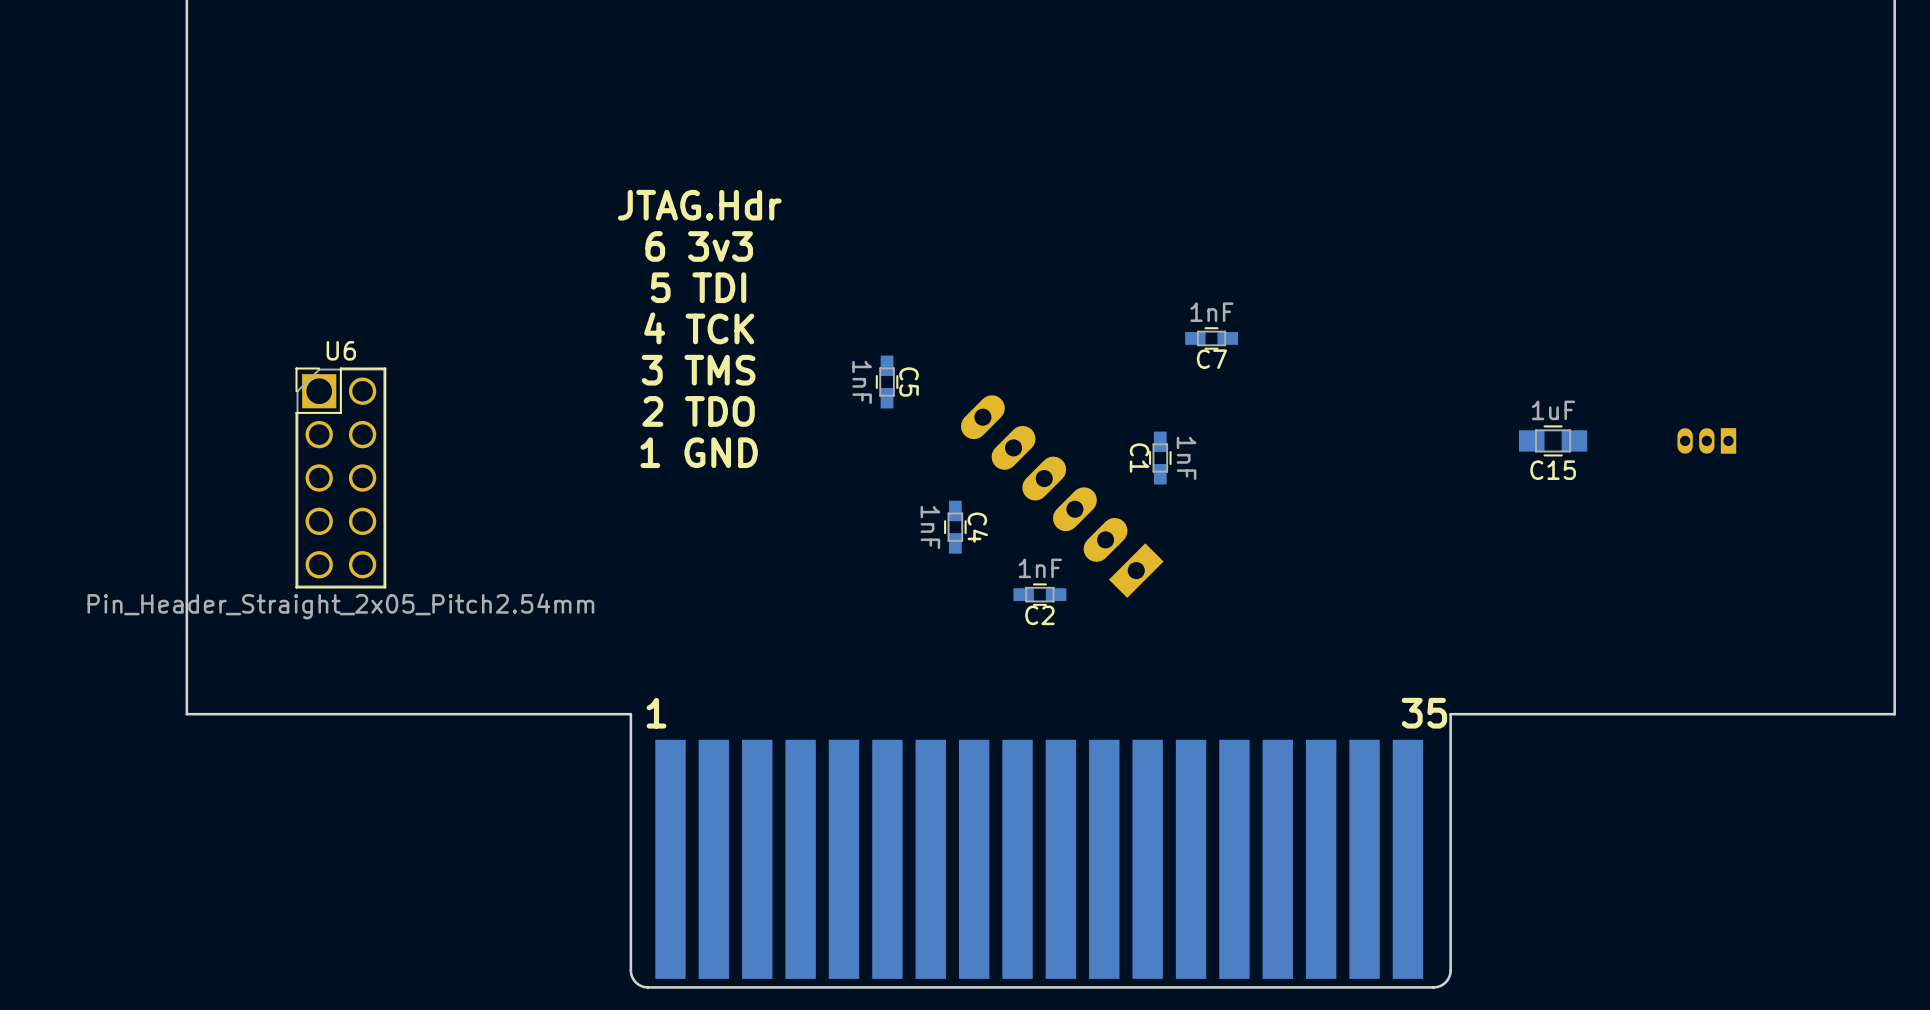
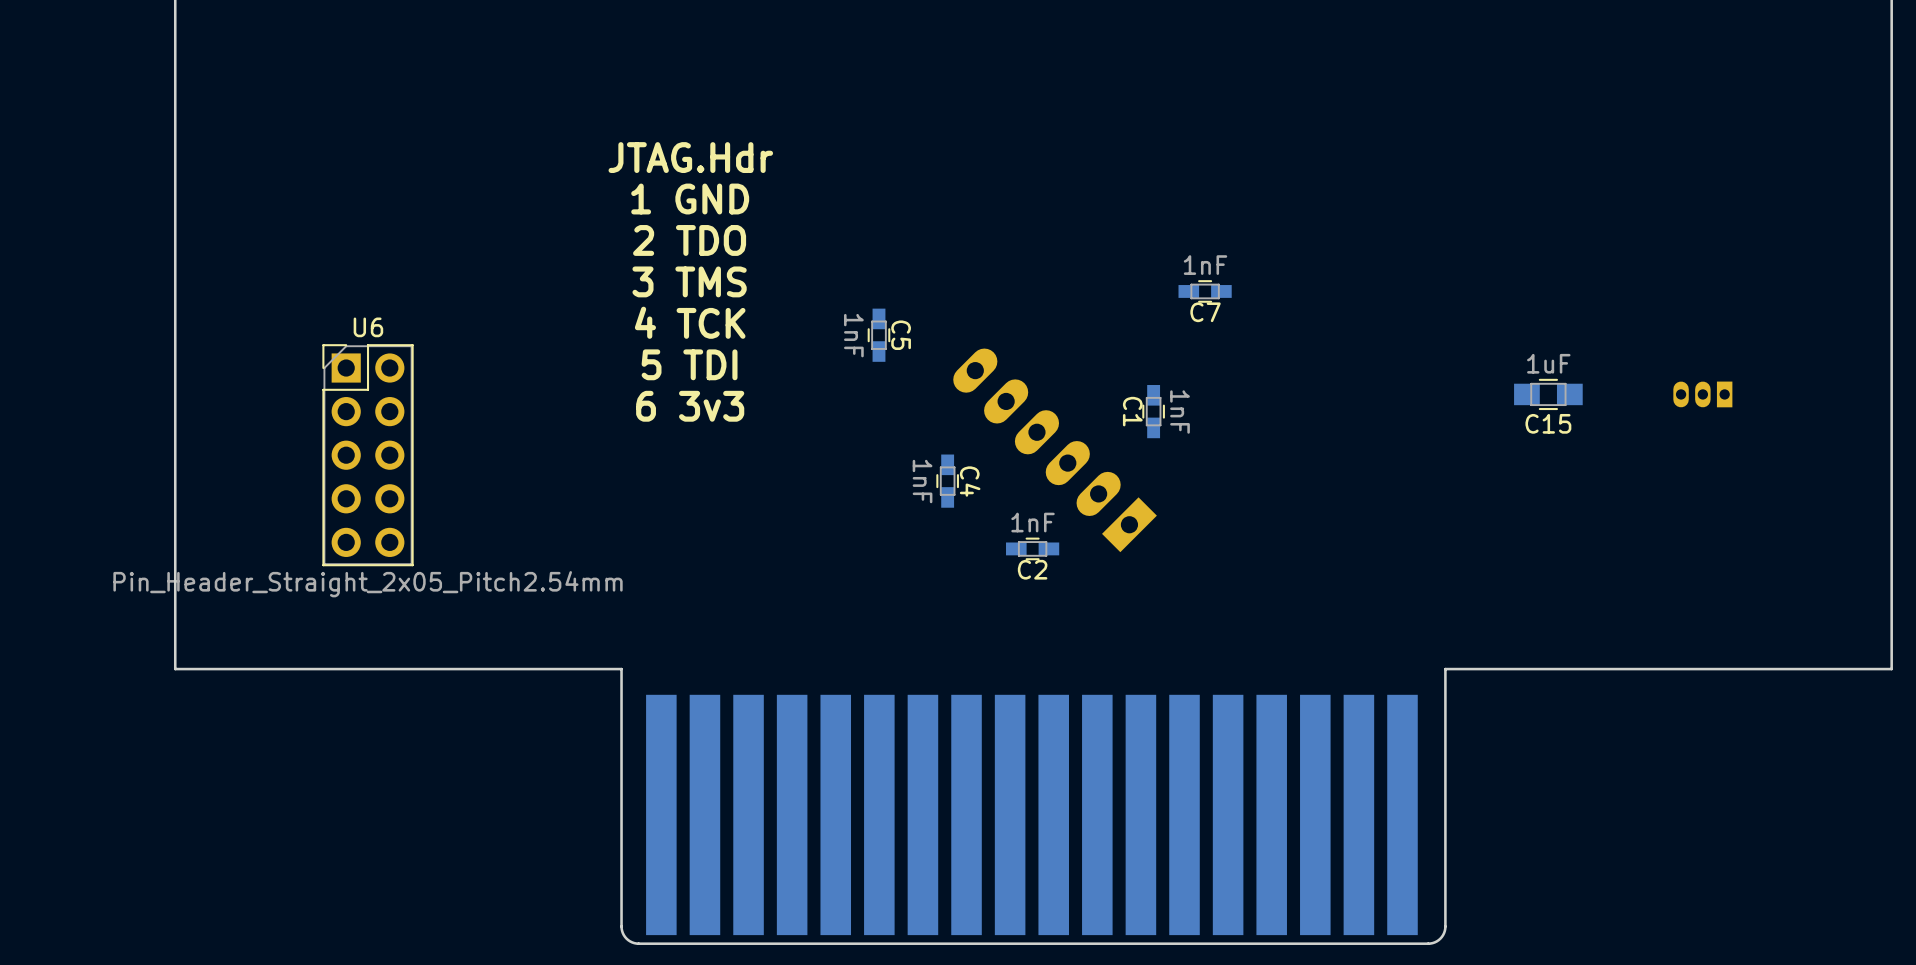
text: 6 3v3 (699, 246) -> 1 GND (690, 199)
text: 5 TDI (698, 287) -> 2 TDO (689, 240)
text: 4 TCK (699, 328) -> 3 TMS (689, 281)
U6 footprint: [295, 367, 387, 589] -> [322, 344, 414, 567]
text: 3 TMS (698, 370) -> 4 TCK (690, 322)
text: 2 TDO (698, 411) -> 5 TDI (689, 364)
text: 1 GND (699, 452) -> 6 3v3 (690, 406)
text: 1 (656, 713) -> none
text: 35 (1424, 713) -> none

